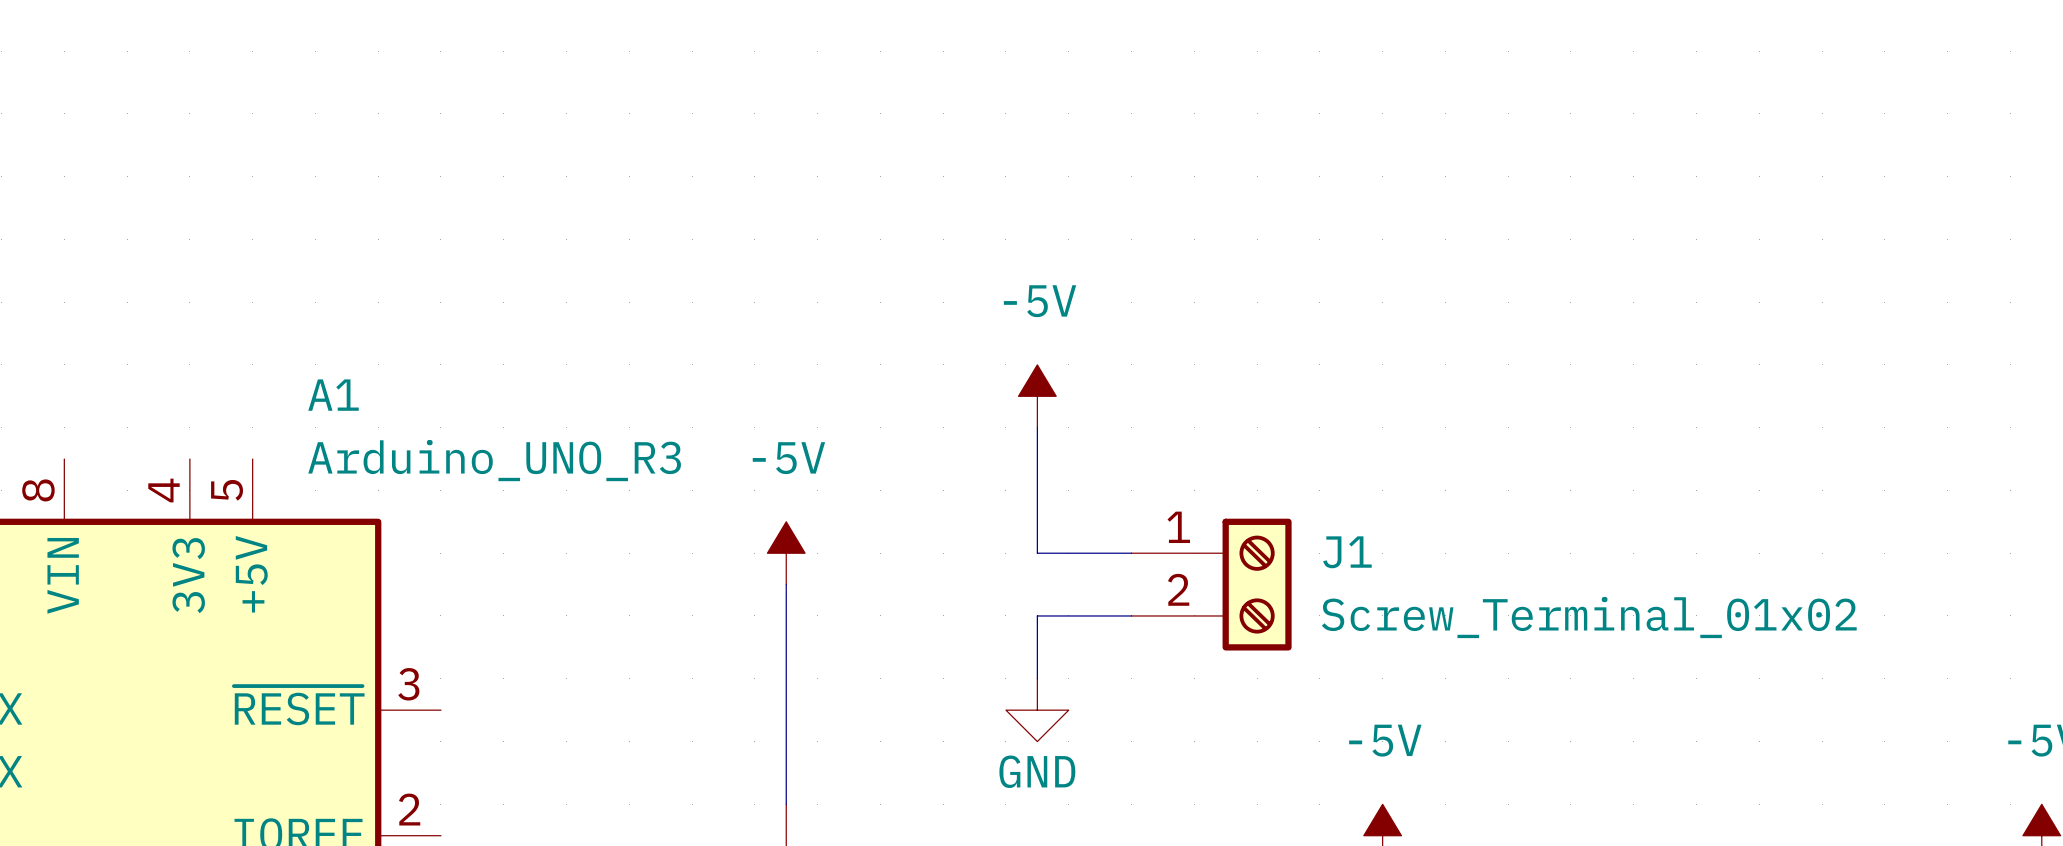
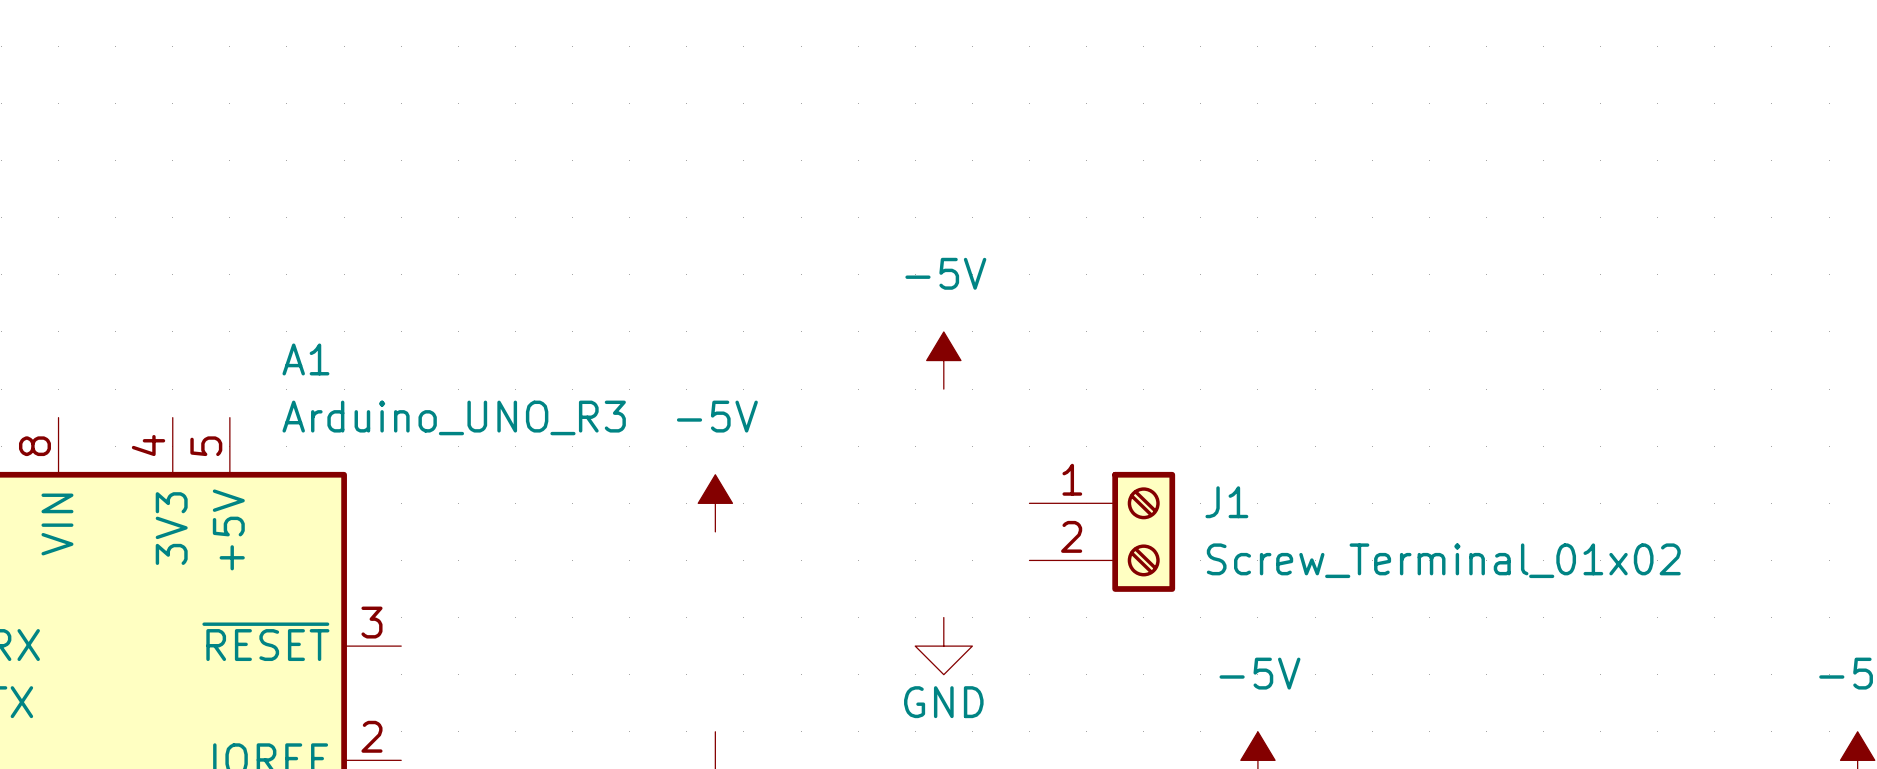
bus: (1037, 427) (1037, 553) (1131, 553) -> none
bus: (786, 584) (786, 804) -> none
bus: (1131, 615) (1037, 615) (1037, 678) -> none

